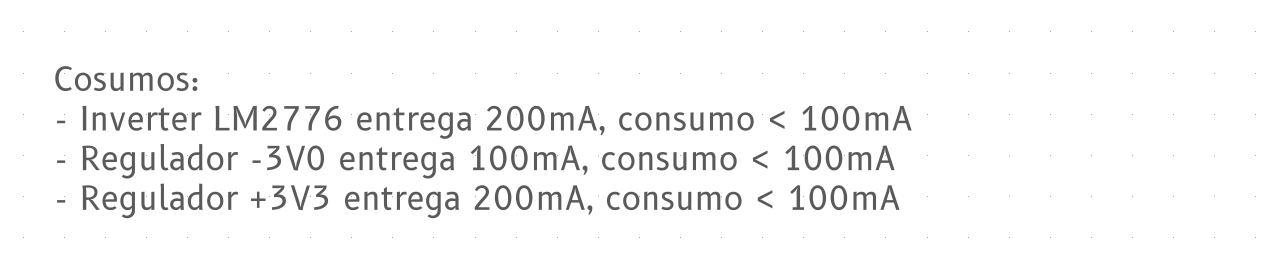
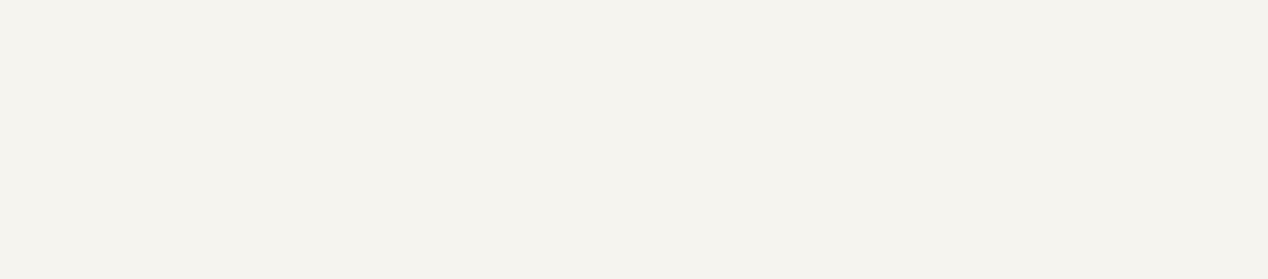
text: Cosumos: (126, 78) -> none
text: - Inverter LM2776 entrega 200mA, consumo < 100mA (484, 122) -> none
text: - Regulador -3V0 entrega 100mA, consumo < 100mA (475, 161) -> none
text: - Regulador +3V3 entrega 200mA, consumo < 100mA (478, 200) -> none

